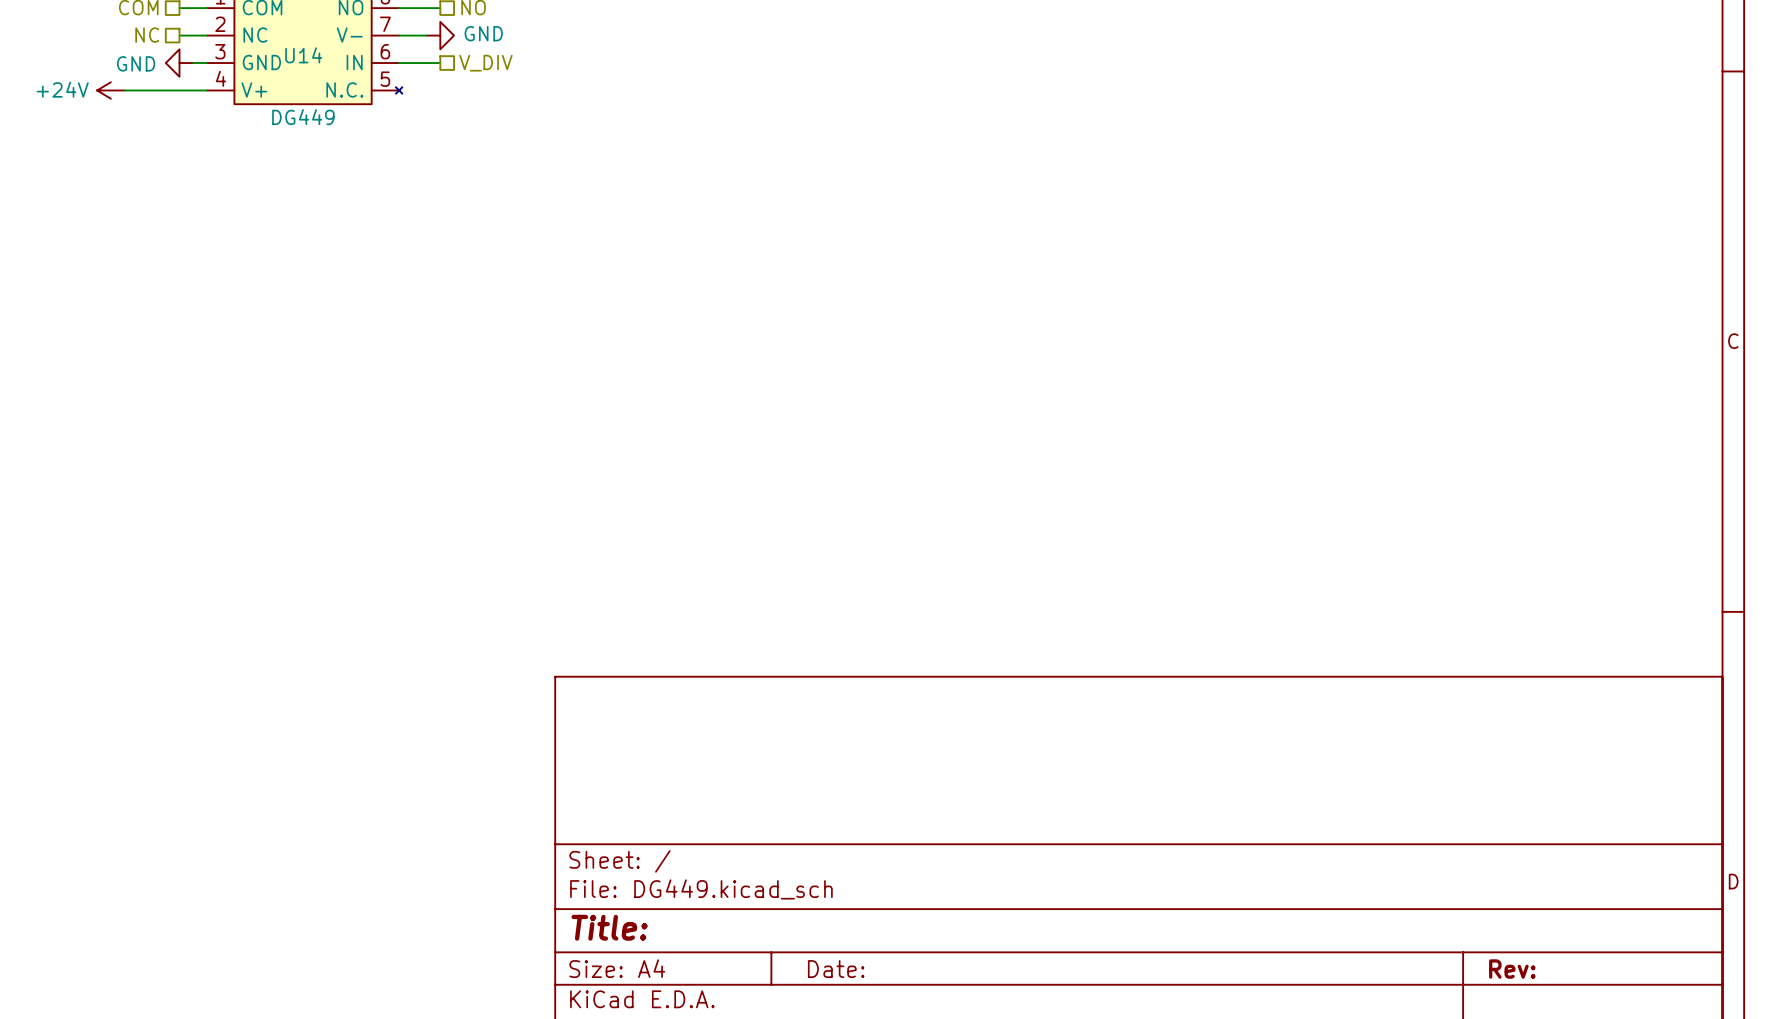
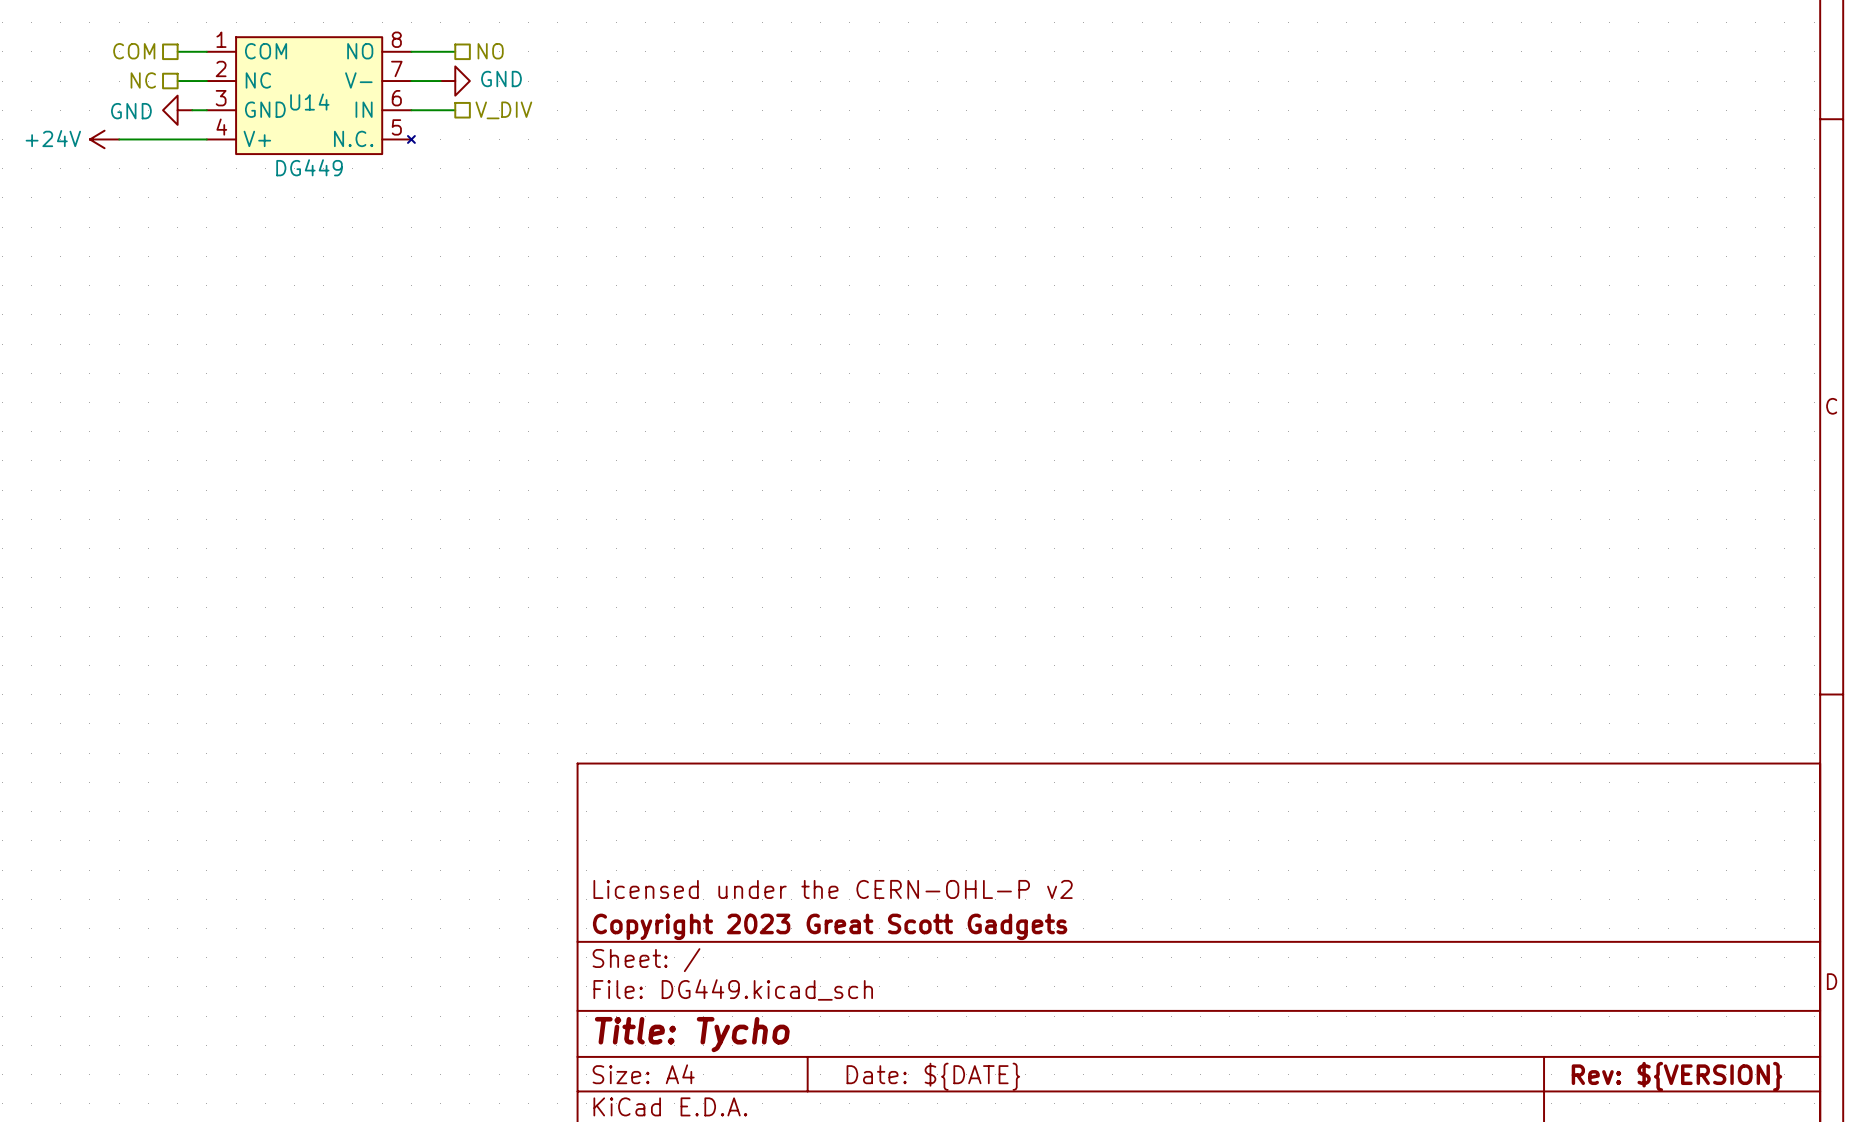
title block: none -> Licensed under the CERN-OHL-P v2 (833, 889)
title block: none -> Copyright 2023 Great Scott Gadgets (830, 926)
title block: Title: (609, 927) -> Title: Tycho (692, 1034)
title block: Date: (836, 969) -> Date: ${DATE} (933, 1076)
title block: Rev: (1512, 969) -> Rev: ${VERSION} (1676, 1076)

